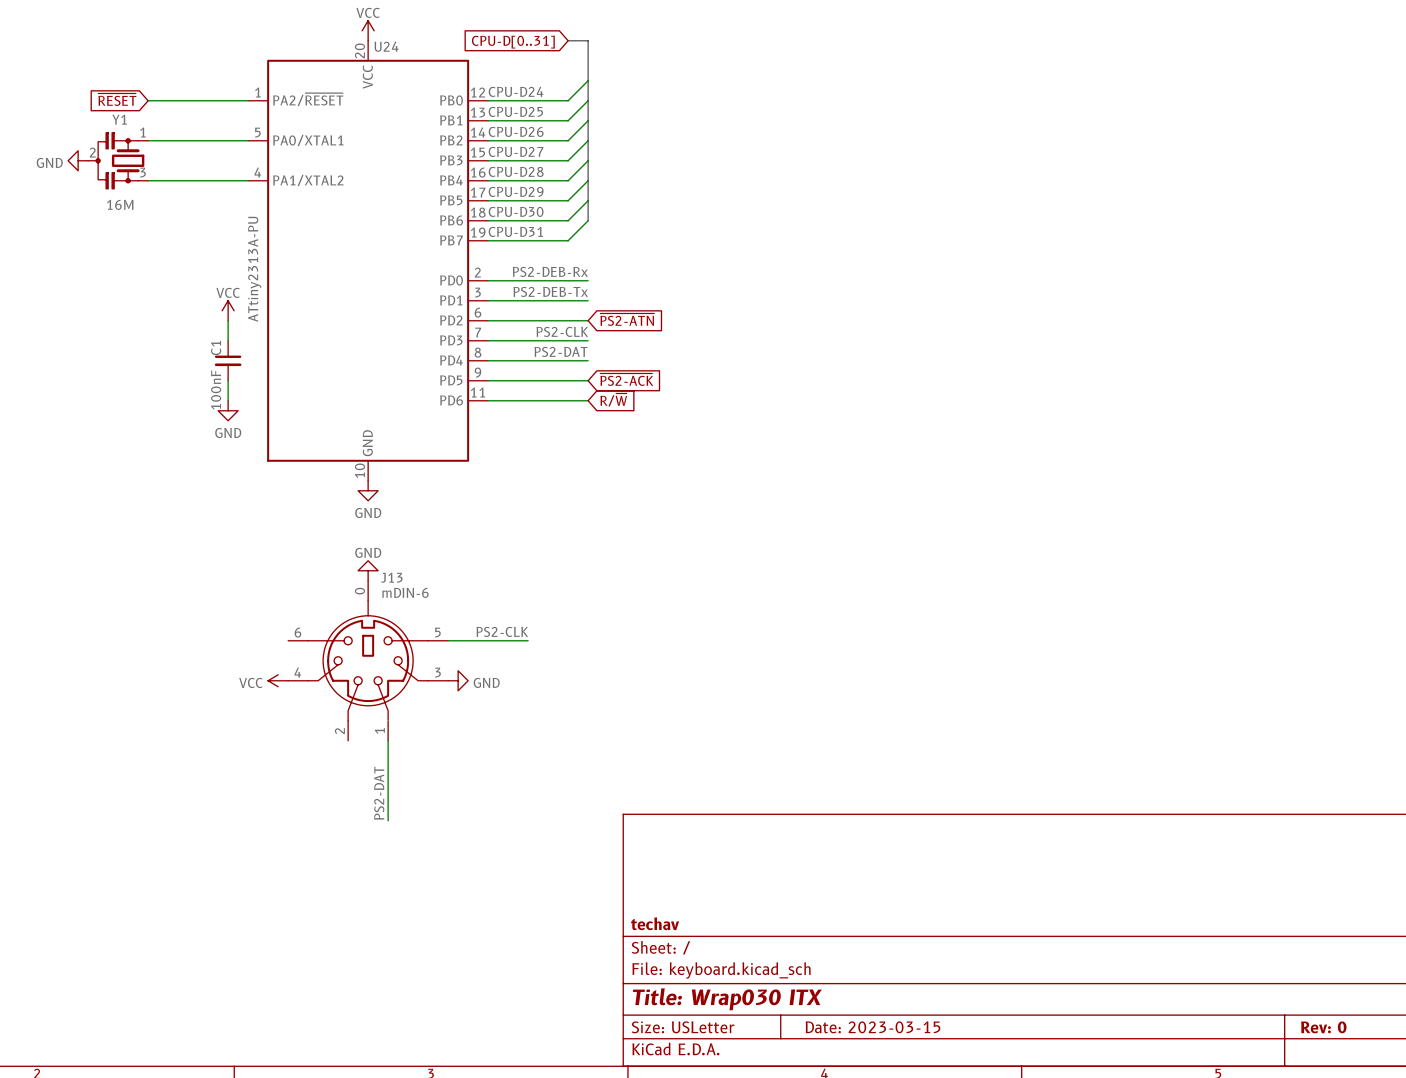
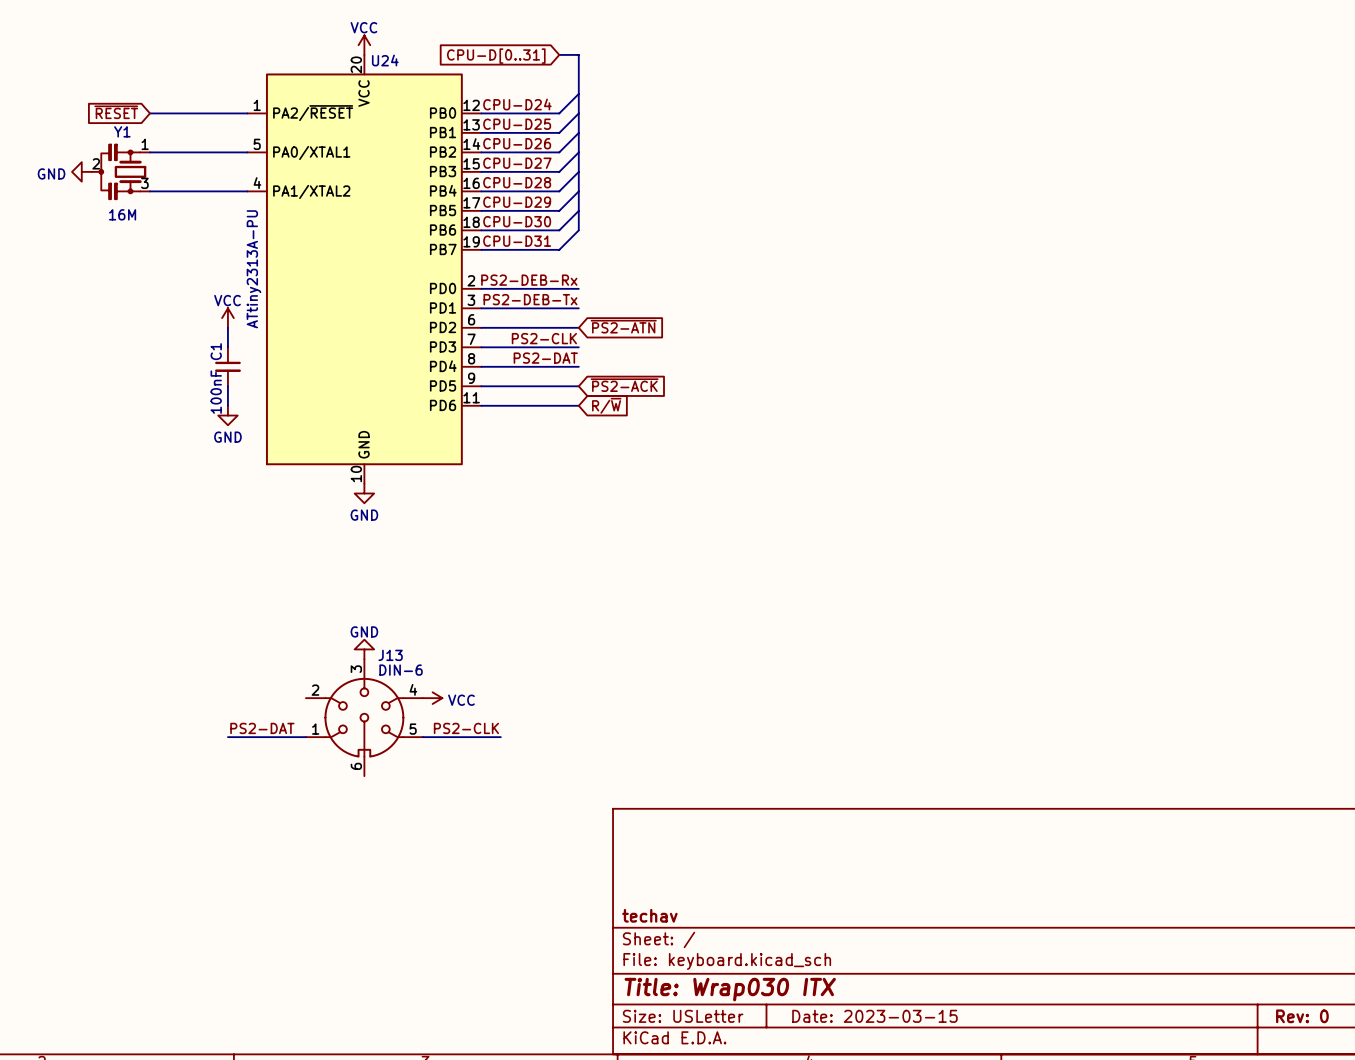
power symbol: GND (368, 570) -> none
J13 name position: J13 (391, 577) -> J13 (390, 655)
J13 symbol: [288, 580, 449, 741] -> [305, 659, 423, 777]
J13 value: mDIN-6 (405, 592) -> DIN-6 (401, 670)
label position: PS2-CLK (502, 631) -> PS2-CLK (466, 728)
wire: (448, 640) (528, 640) -> (422, 737) (500, 737)
power symbol: none -> GND (364, 649)
power symbol rotation: 0° (278, 680) -> 180° (432, 698)
power symbol position: VCC (278, 680) -> VCC (432, 698)
power symbol: GND (458, 680) -> none
wire: none -> (227, 737) (305, 737)
wire: (388, 740) (388, 820) -> none
label rotation: 0° (379, 793) -> 90° clockwise (262, 728)
label position: PS2-DAT (379, 793) -> PS2-DAT (262, 728)

